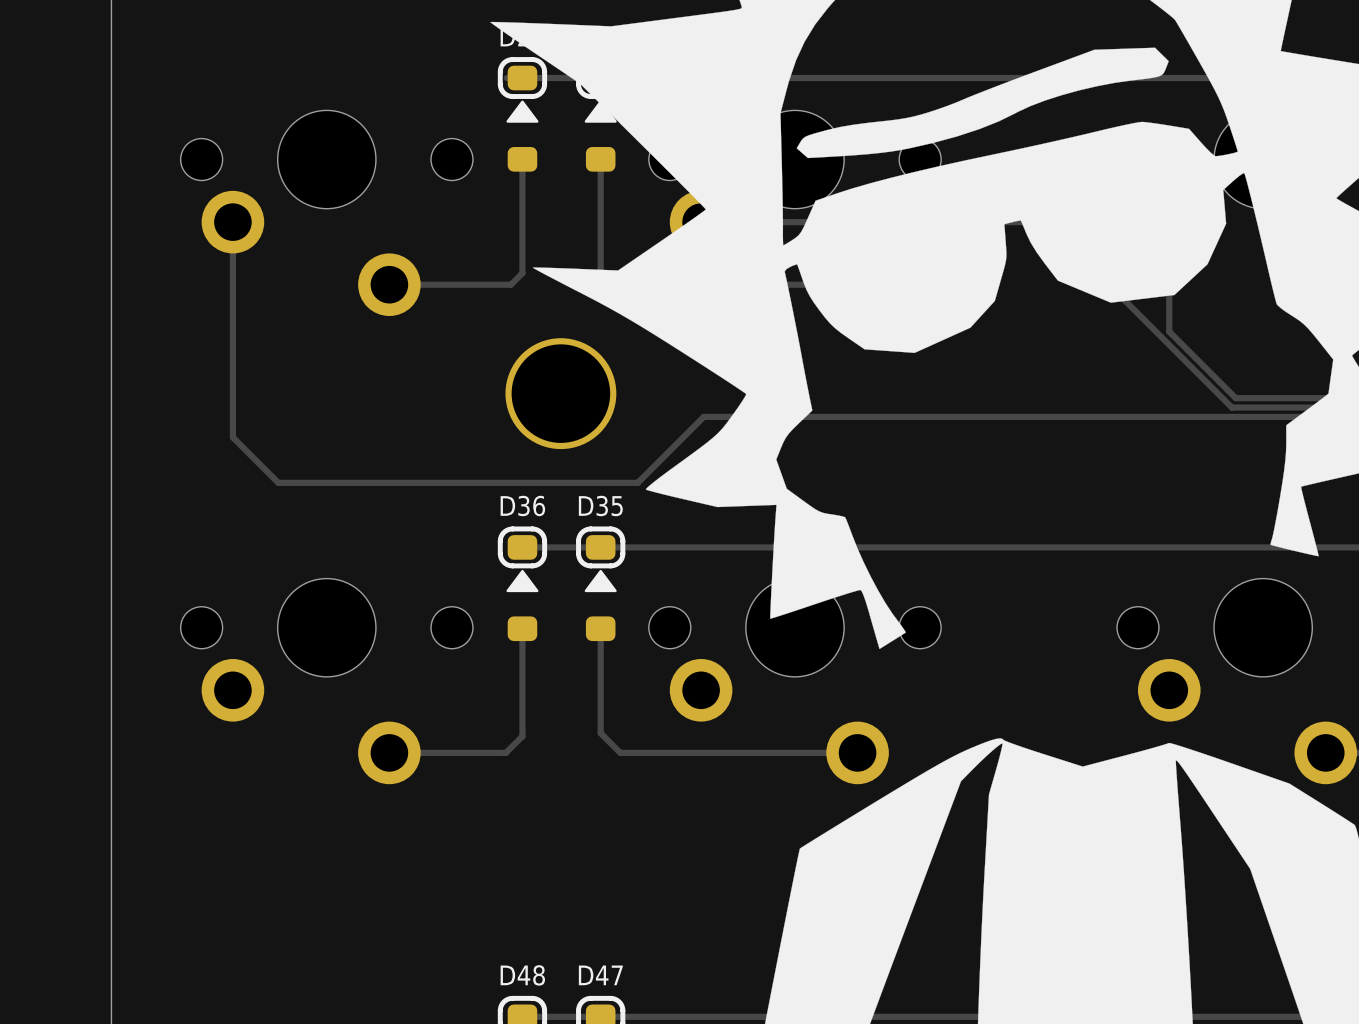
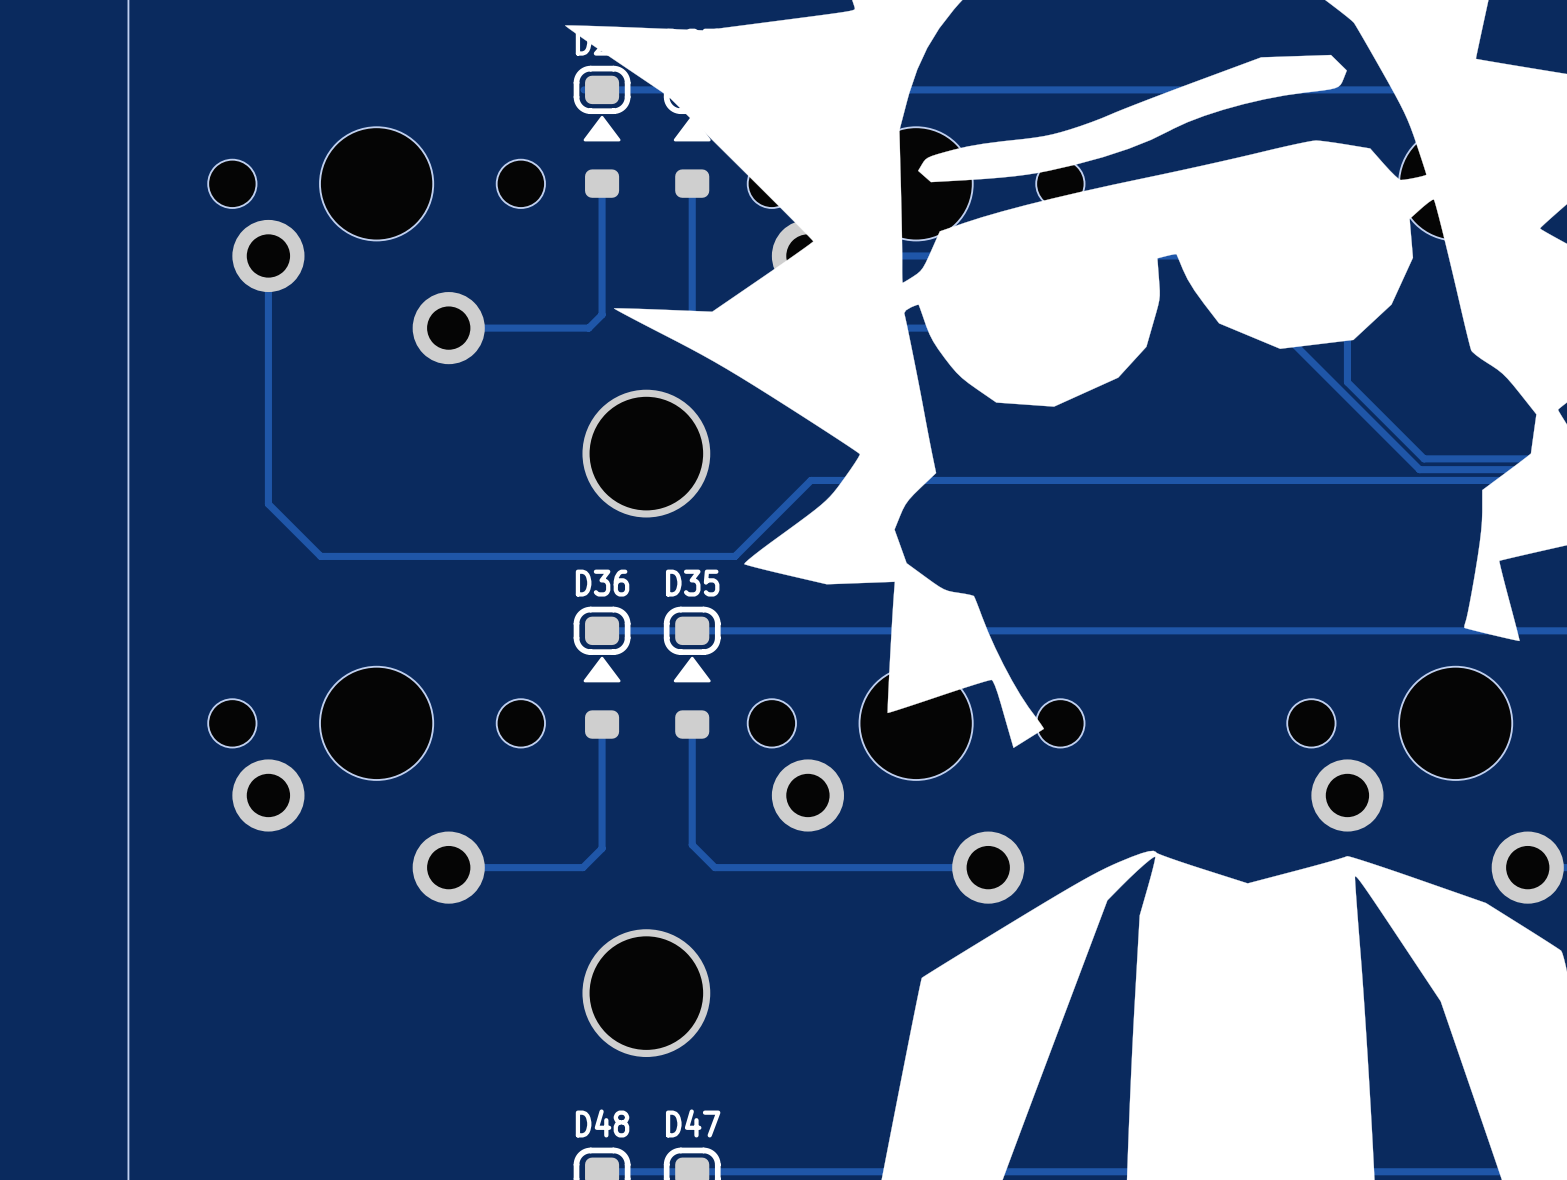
part: none -> (646, 993)

